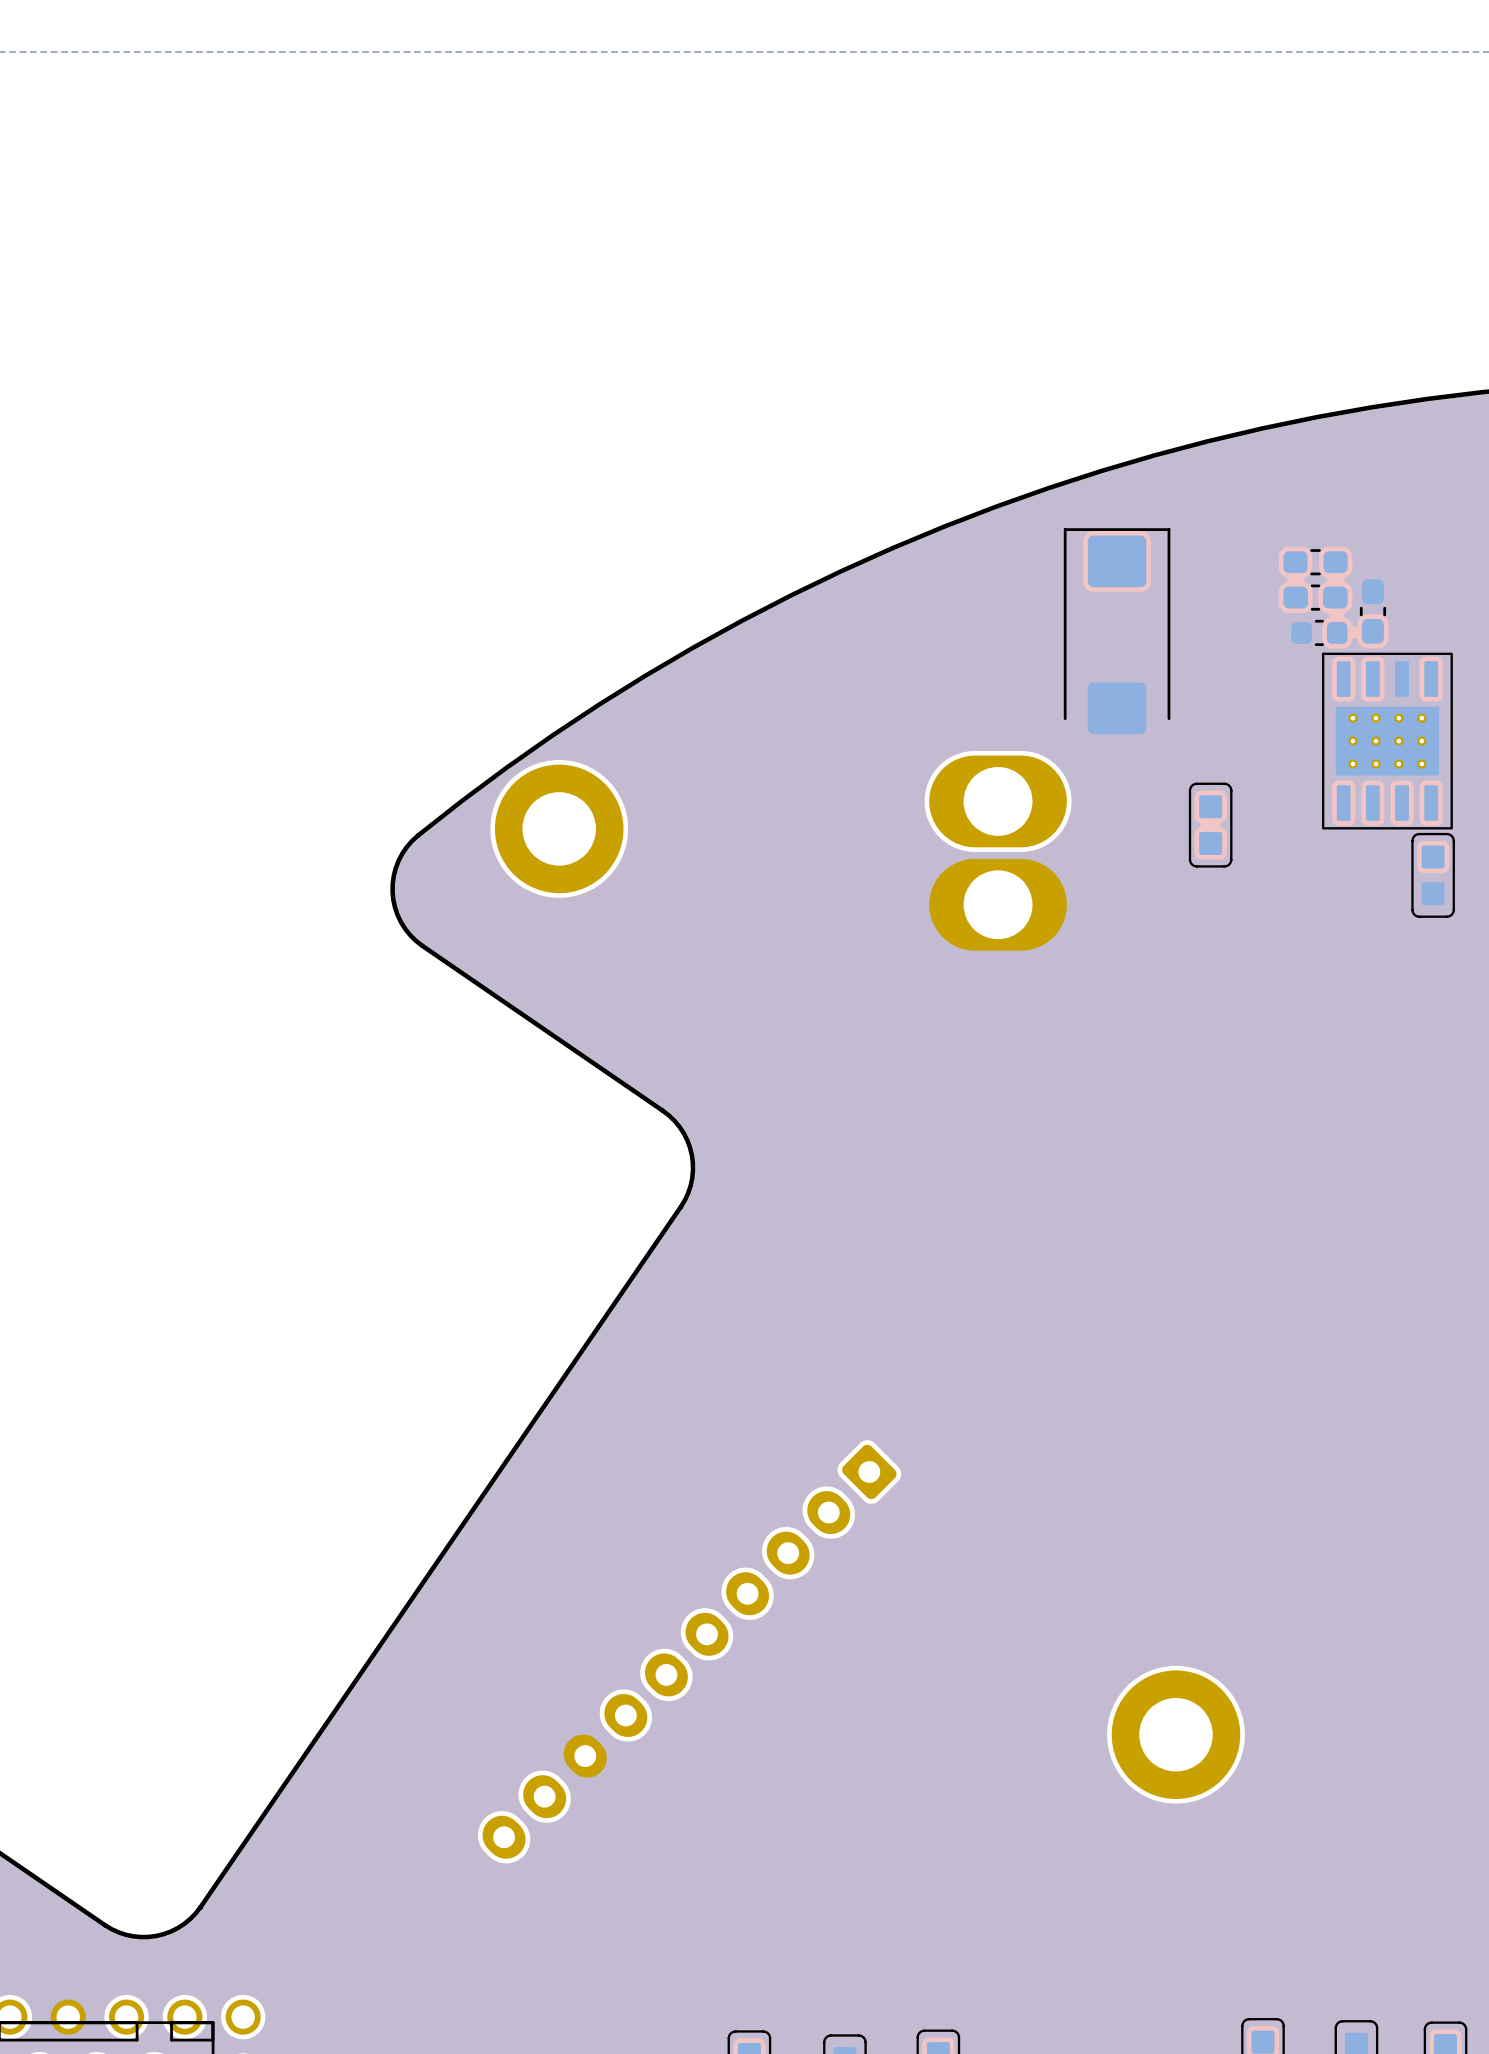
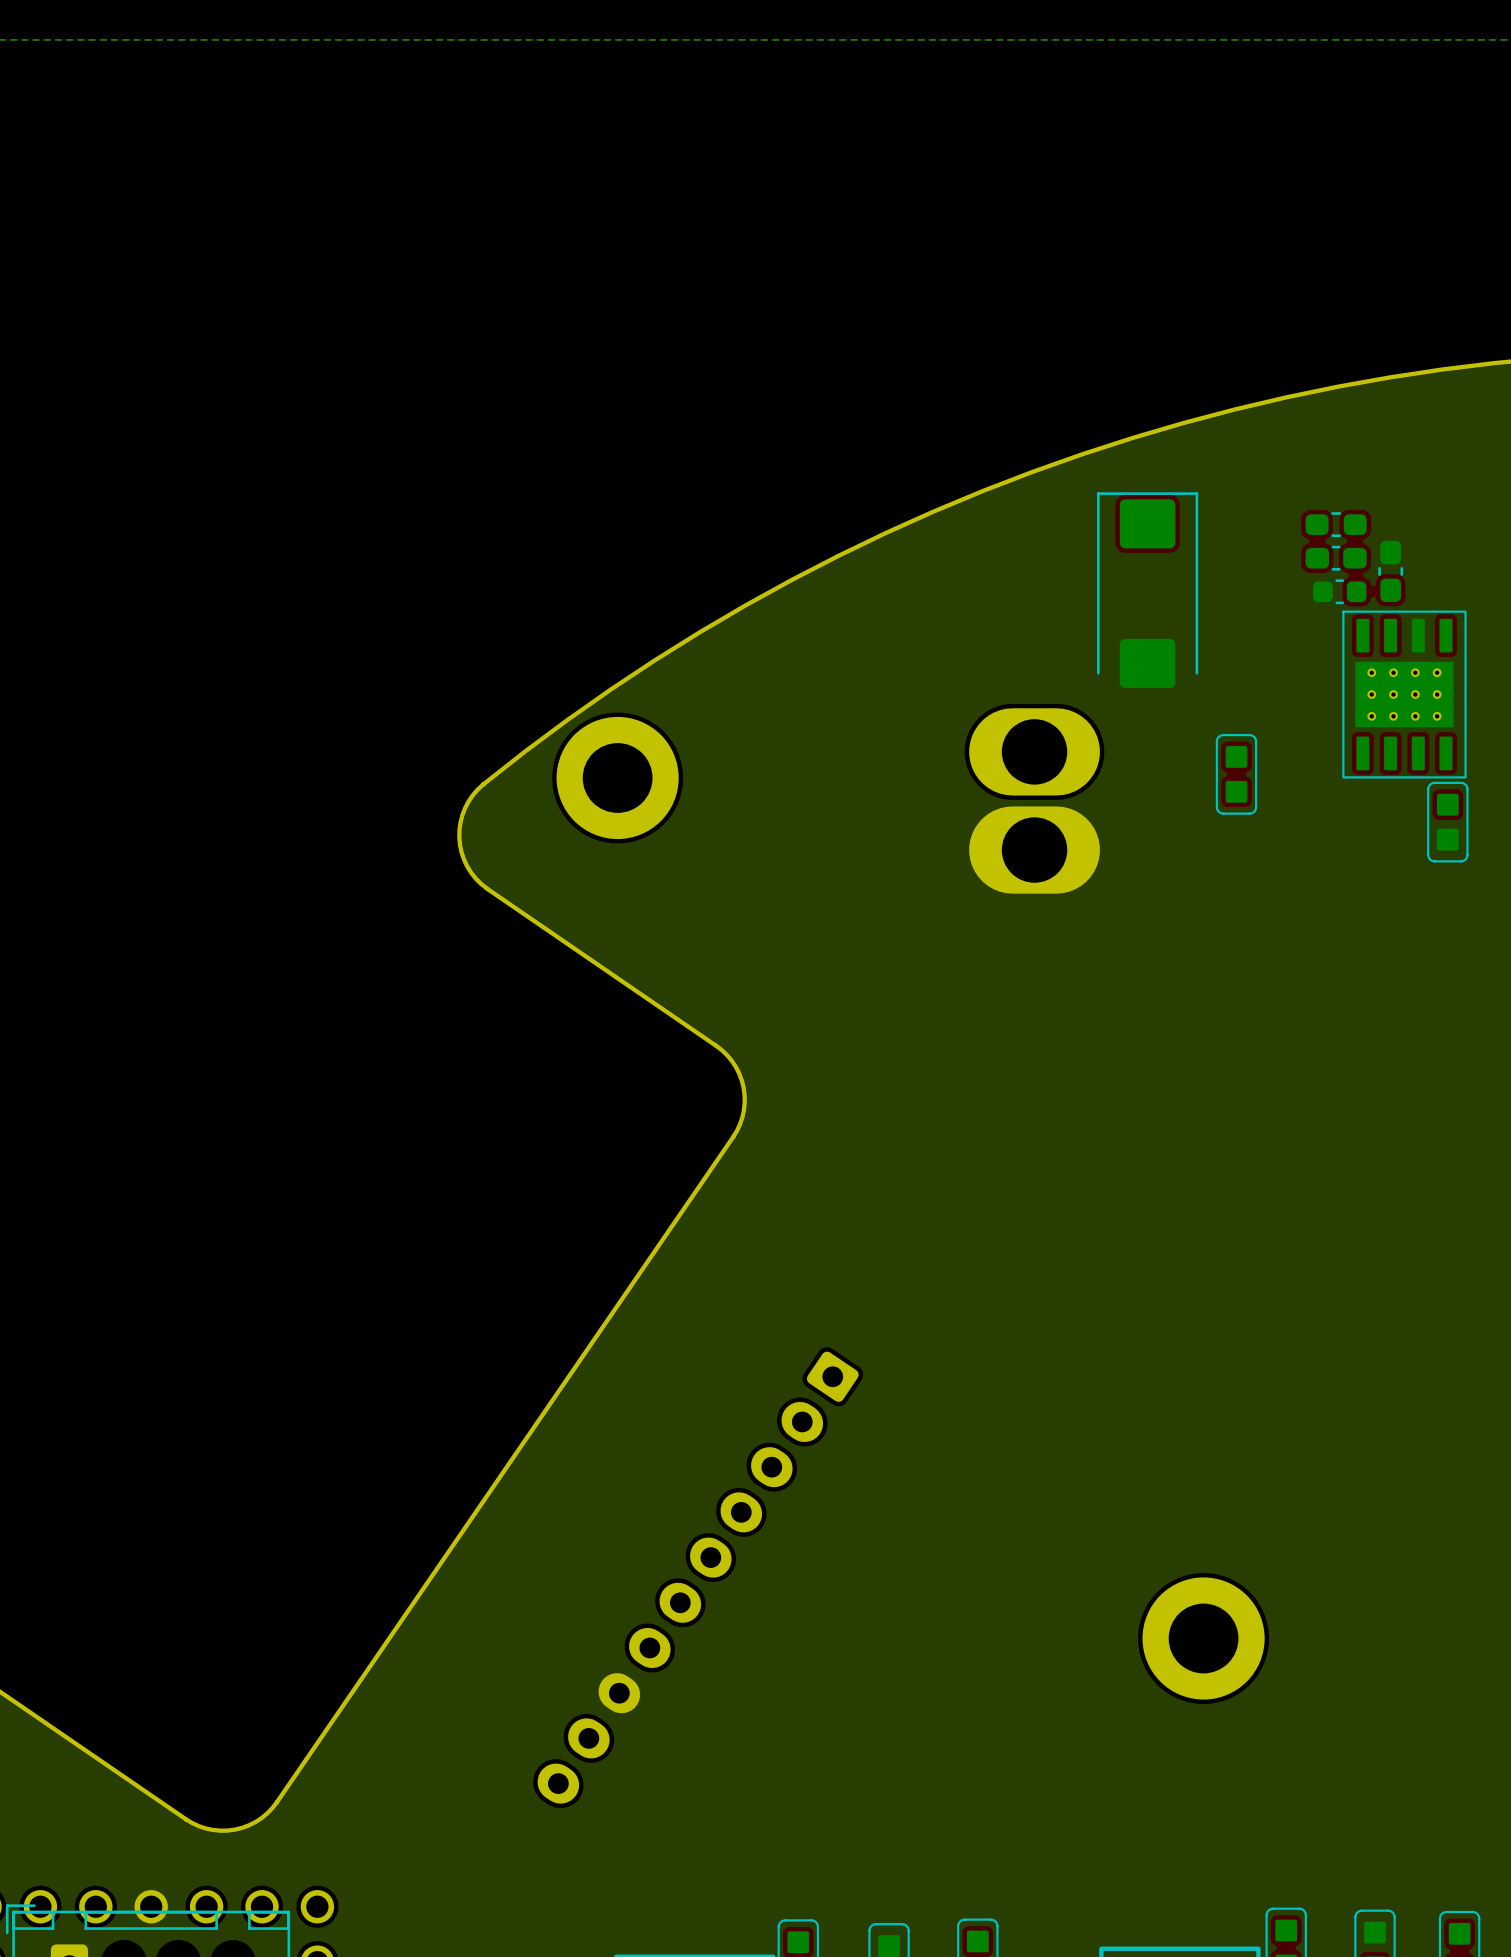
part: (689, 1651) -> none
part: none -> (698, 1577)

